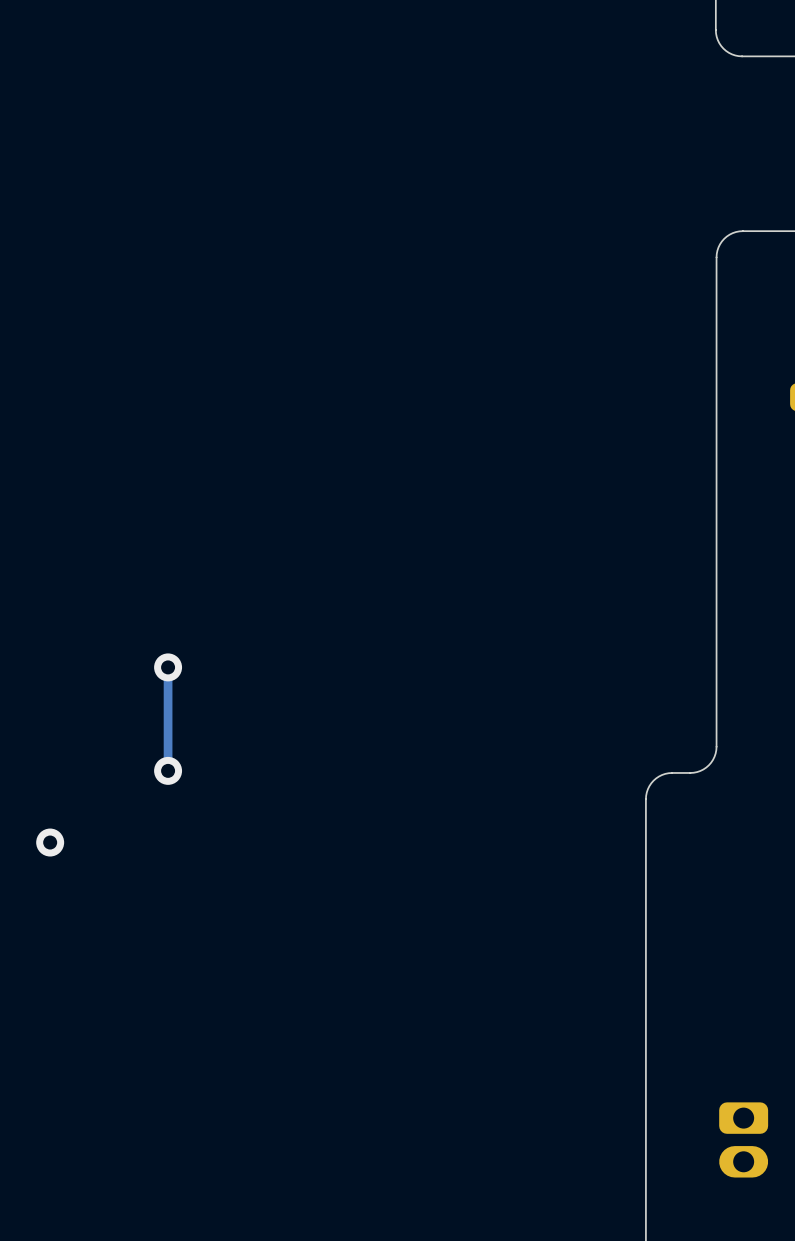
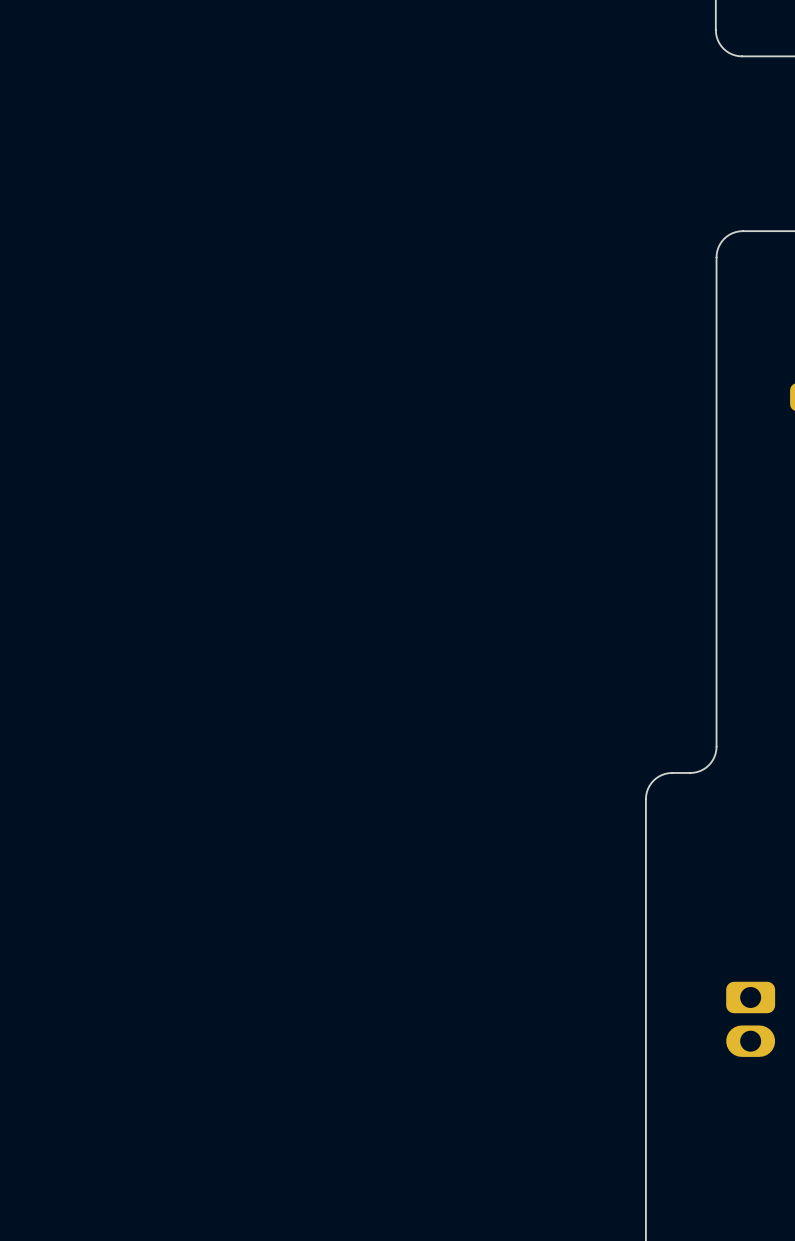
track: (168, 667) (168, 770) -> none
via: (168, 667) -> none
via: (168, 770) -> none
via: (50, 842) -> none
part position: (743, 1139) -> (750, 1019)

